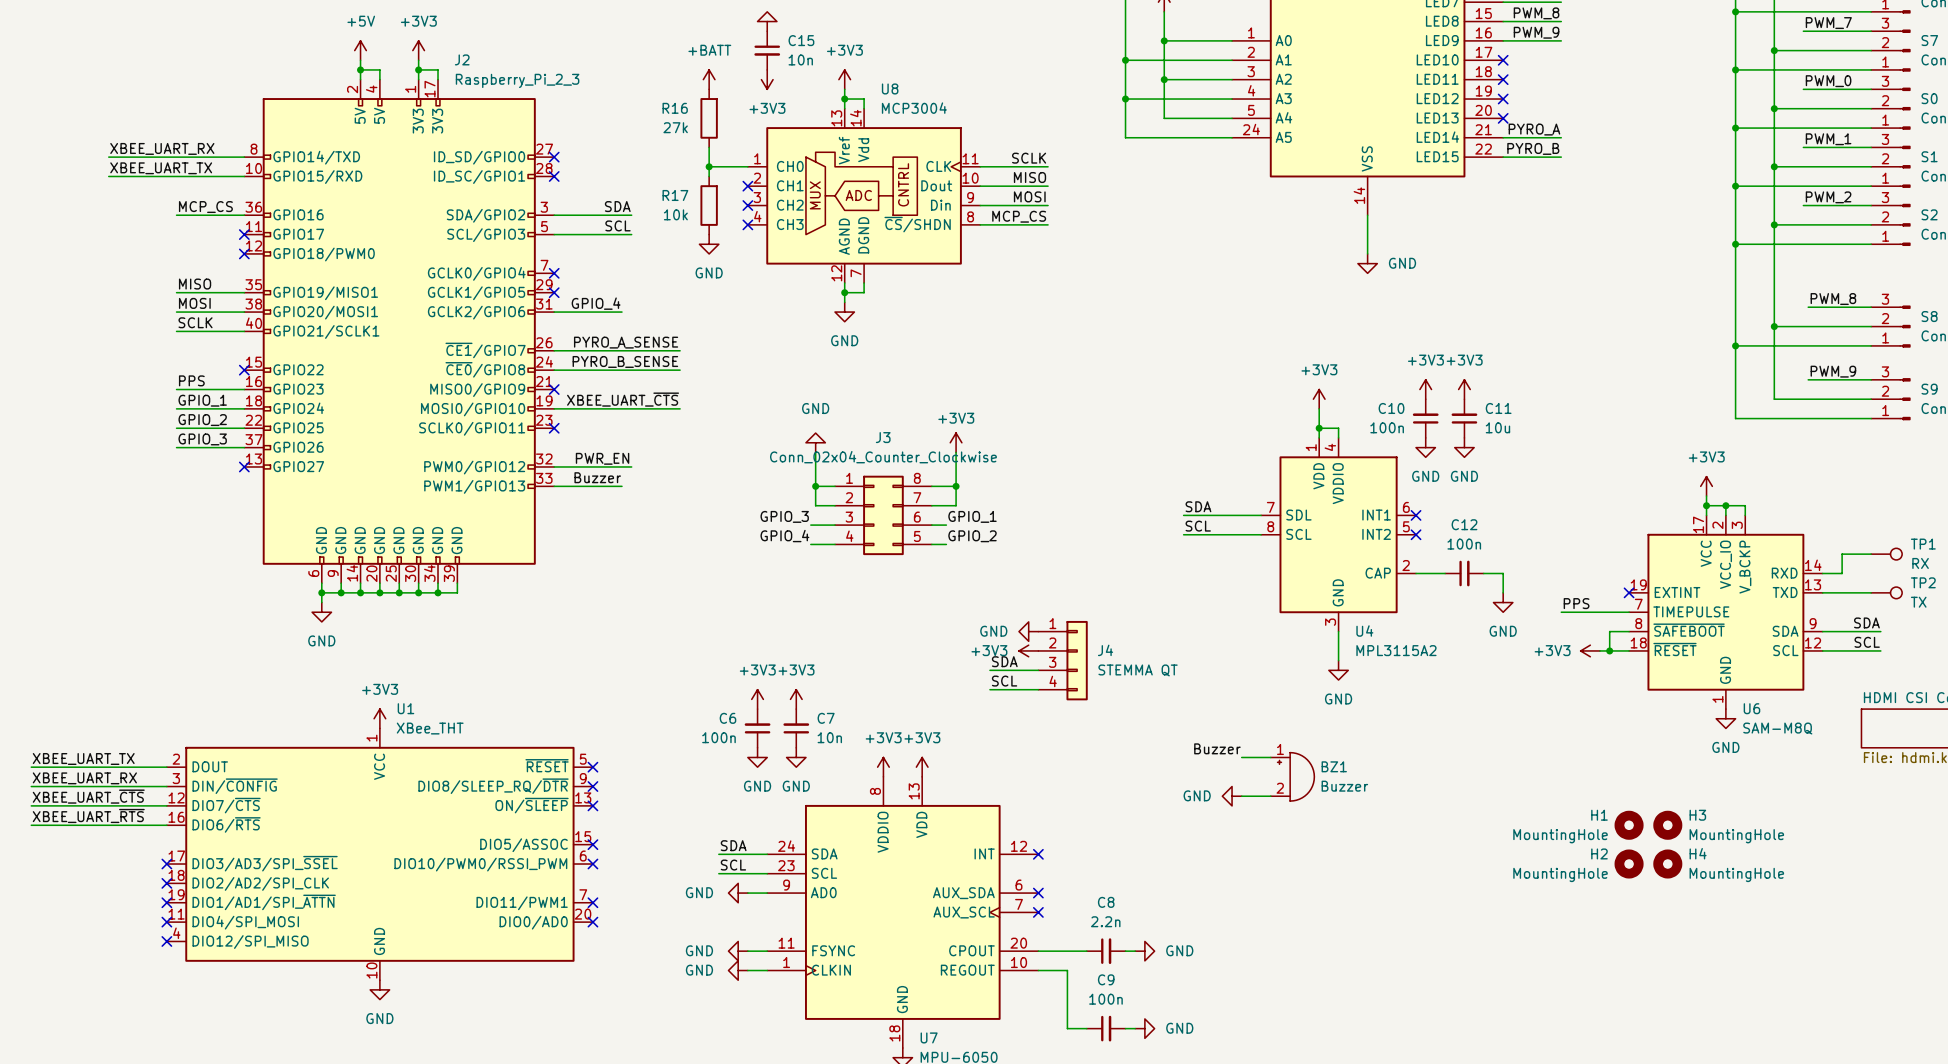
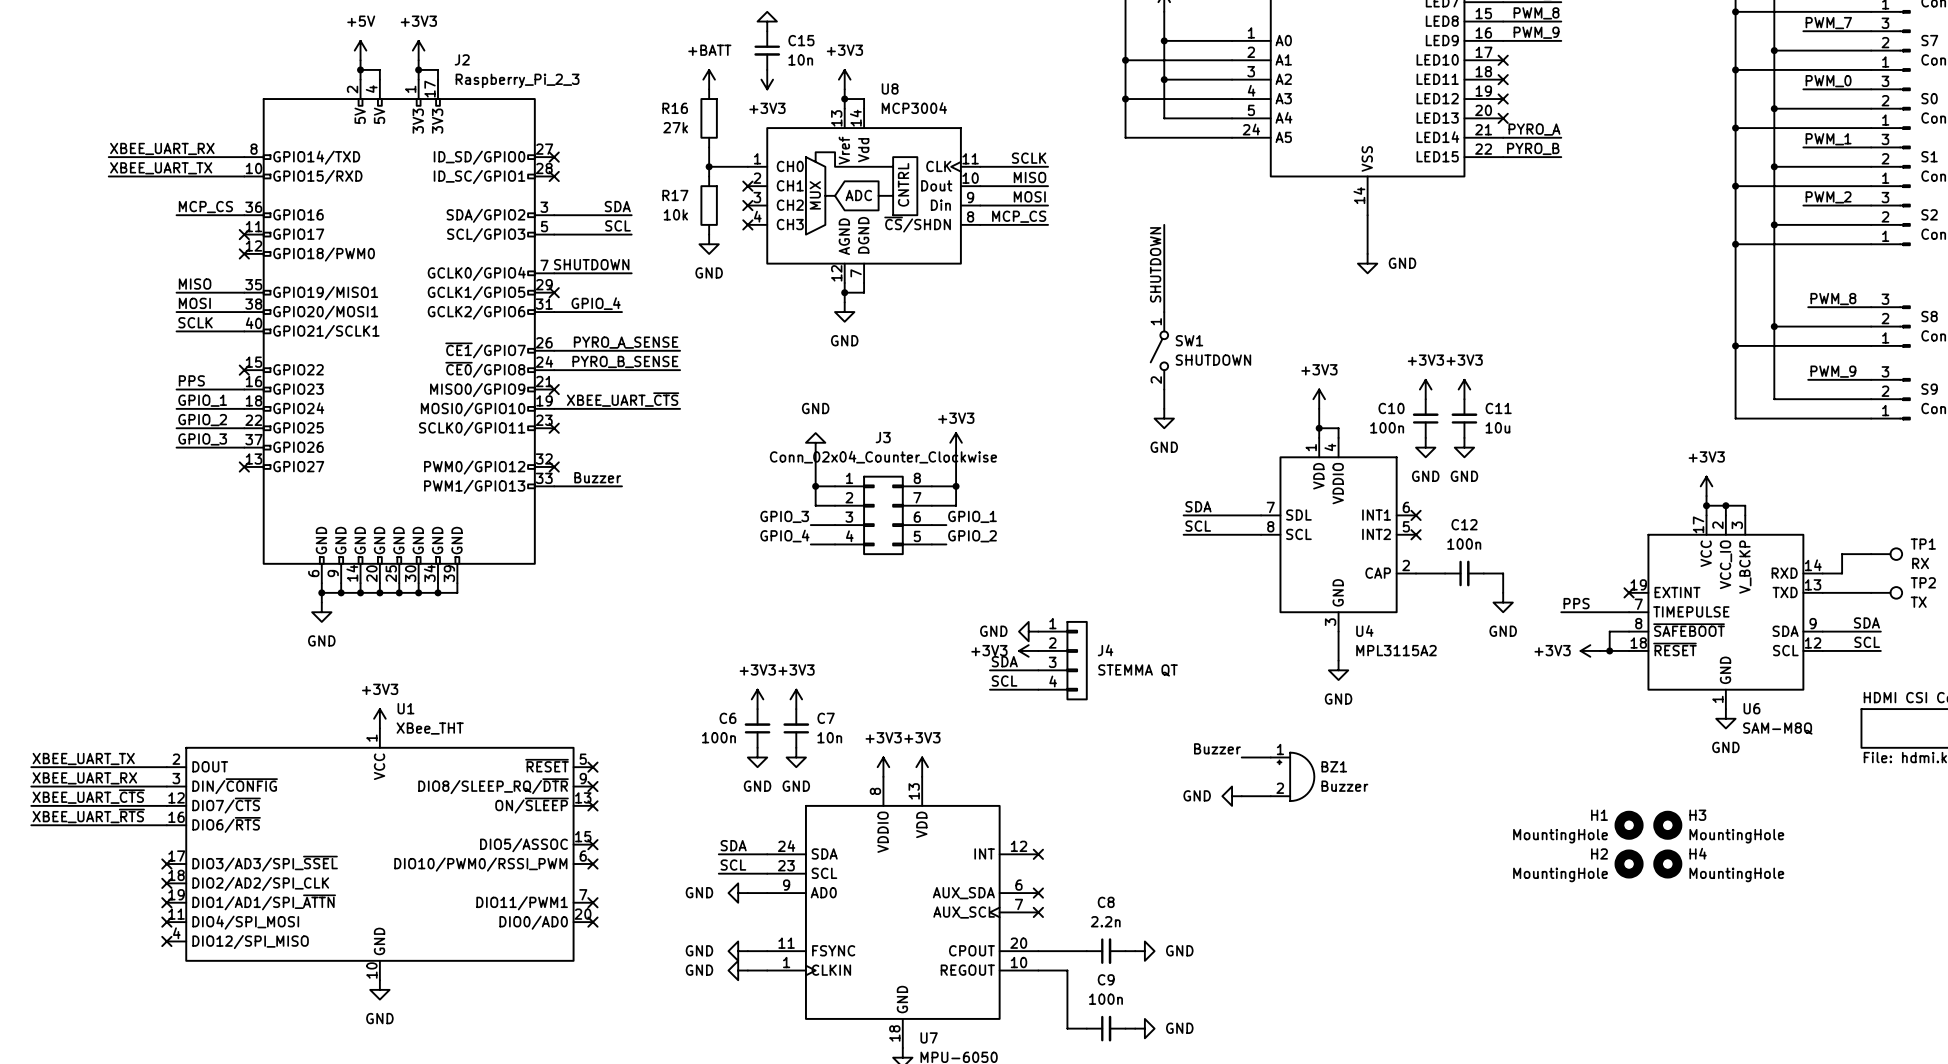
wire: none -> (1164, 224) (1164, 312)
label: none -> SHUTDOWN (591, 264)
label: none -> SHUTDOWN (1155, 264)
wire: none -> (554, 273) (631, 273)
no-connect mark: (554, 273) -> none
SW1: none -> SHUTDOWN (1159, 350)
wire: none -> (1164, 389) (1164, 408)
power symbol: none -> GND (1164, 418)
label: PWR_EN (602, 458) -> none
wire: (554, 466) (631, 466) -> none
no-connect mark: none -> (554, 466)

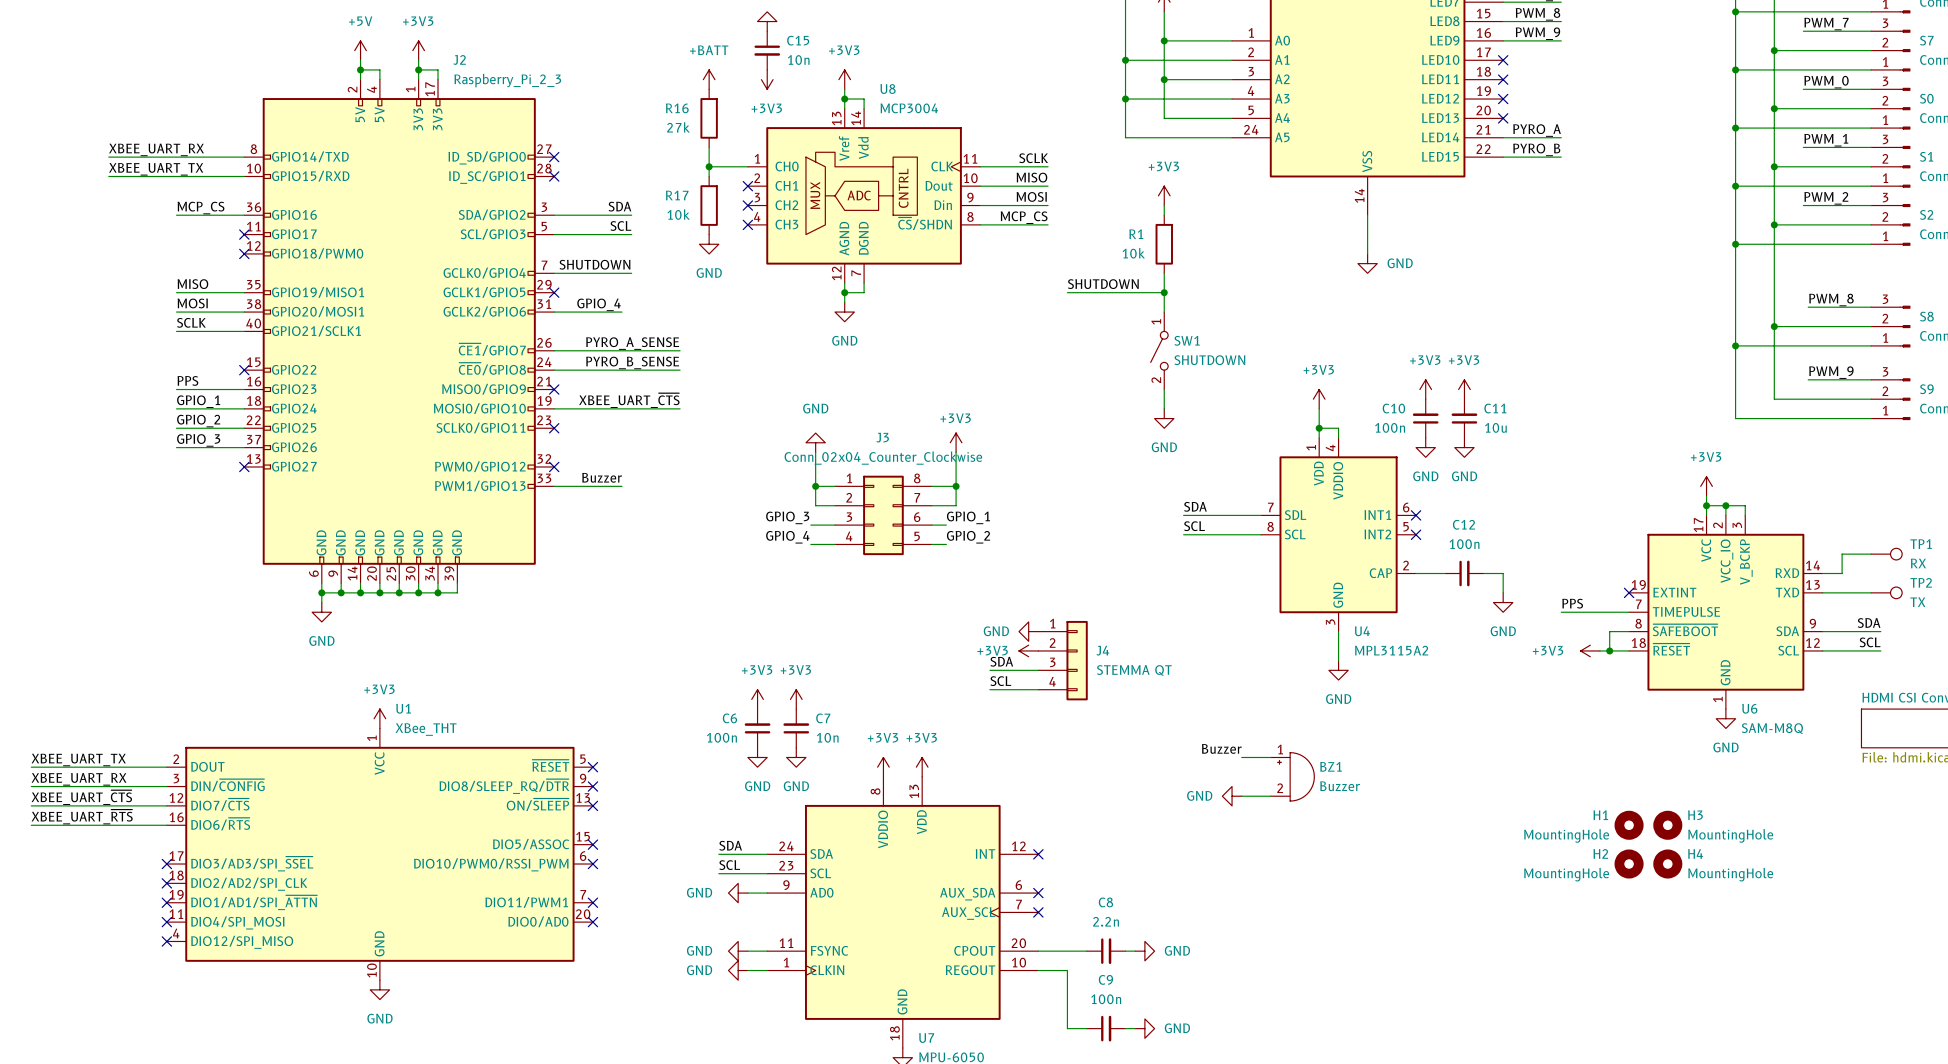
power symbol: none -> +3V3 (1164, 195)
wire: none -> (1164, 205) (1164, 215)
wire: (1164, 224) (1164, 273) -> none
R1: none -> 10k (1164, 244)
label rotation: 0° (1155, 264) -> 90° clockwise (1103, 284)
wire: none -> (1067, 292) (1164, 292)
junction: none -> (1164, 292)

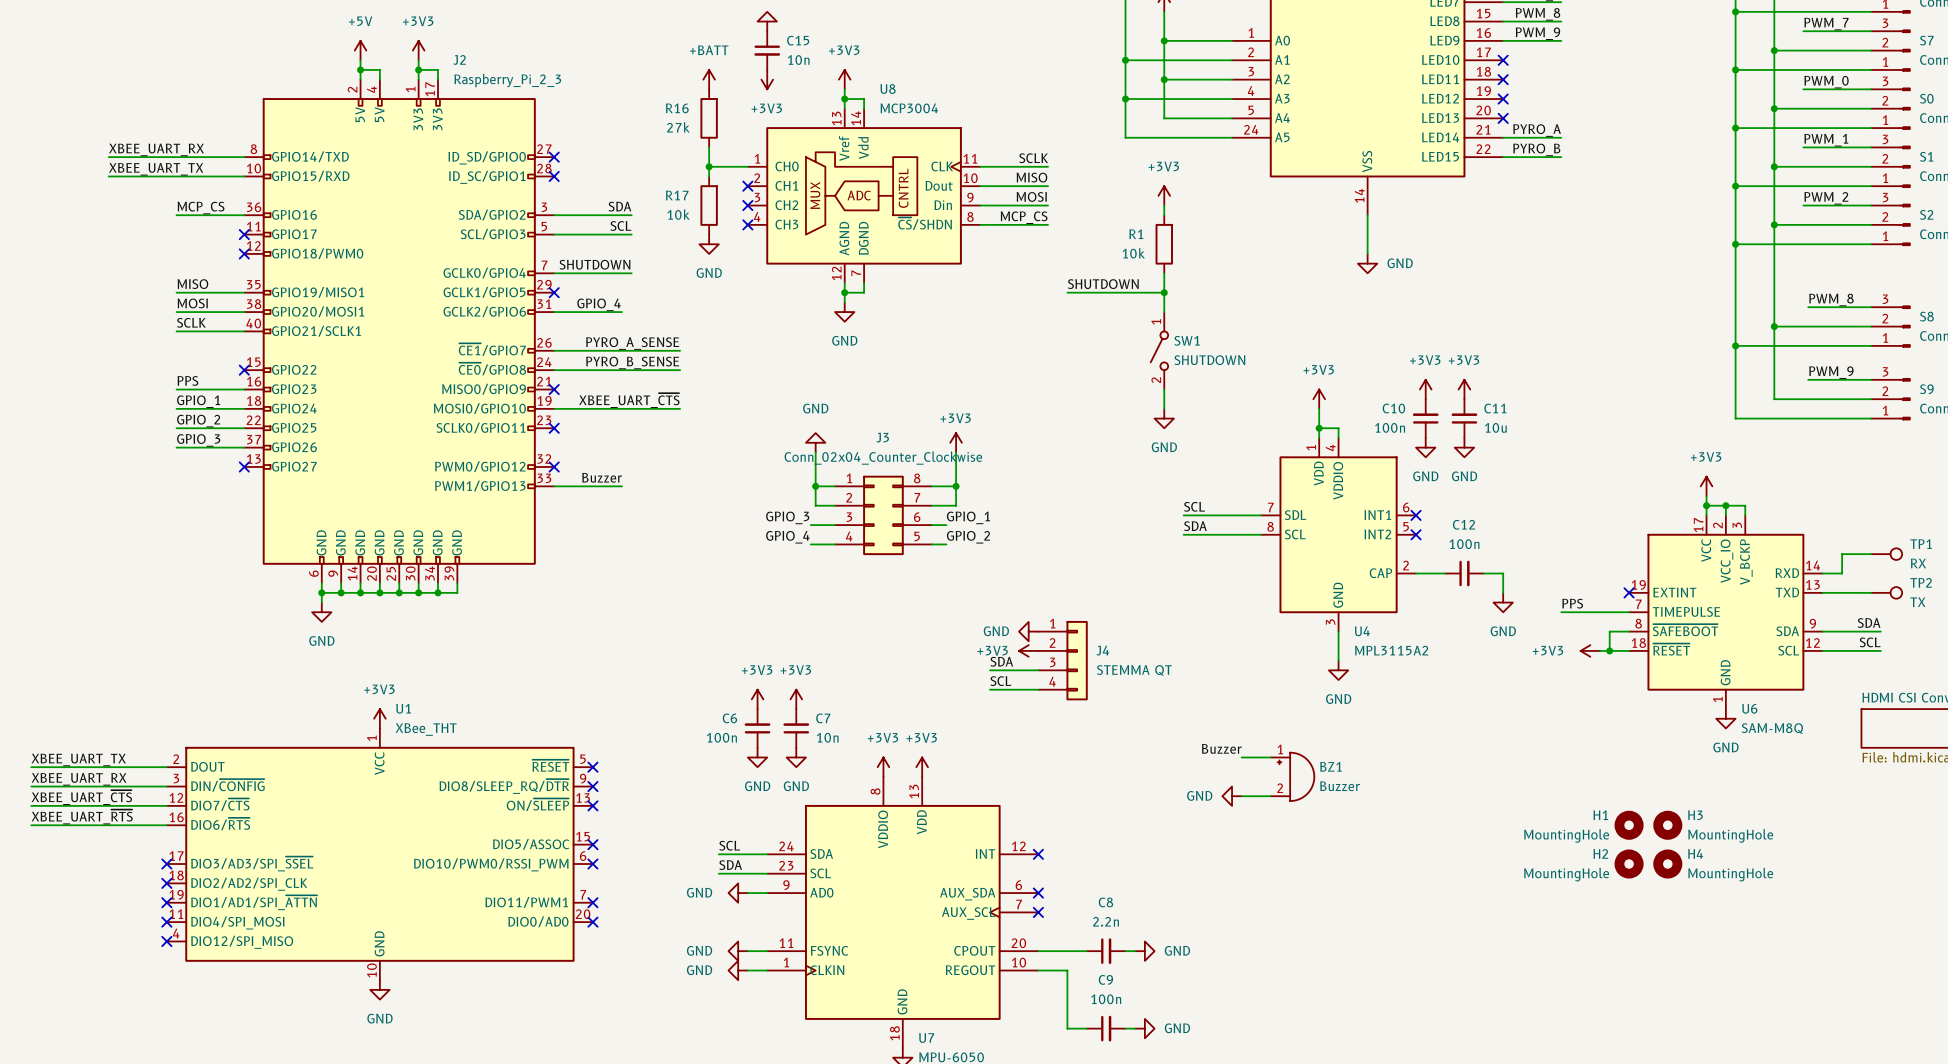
label: SDA (1195, 506) -> SCL (1194, 506)
label: SCL (1194, 526) -> SDA (1195, 526)
label: SDA (730, 845) -> SCL (729, 845)
label: SCL (729, 865) -> SDA (730, 865)

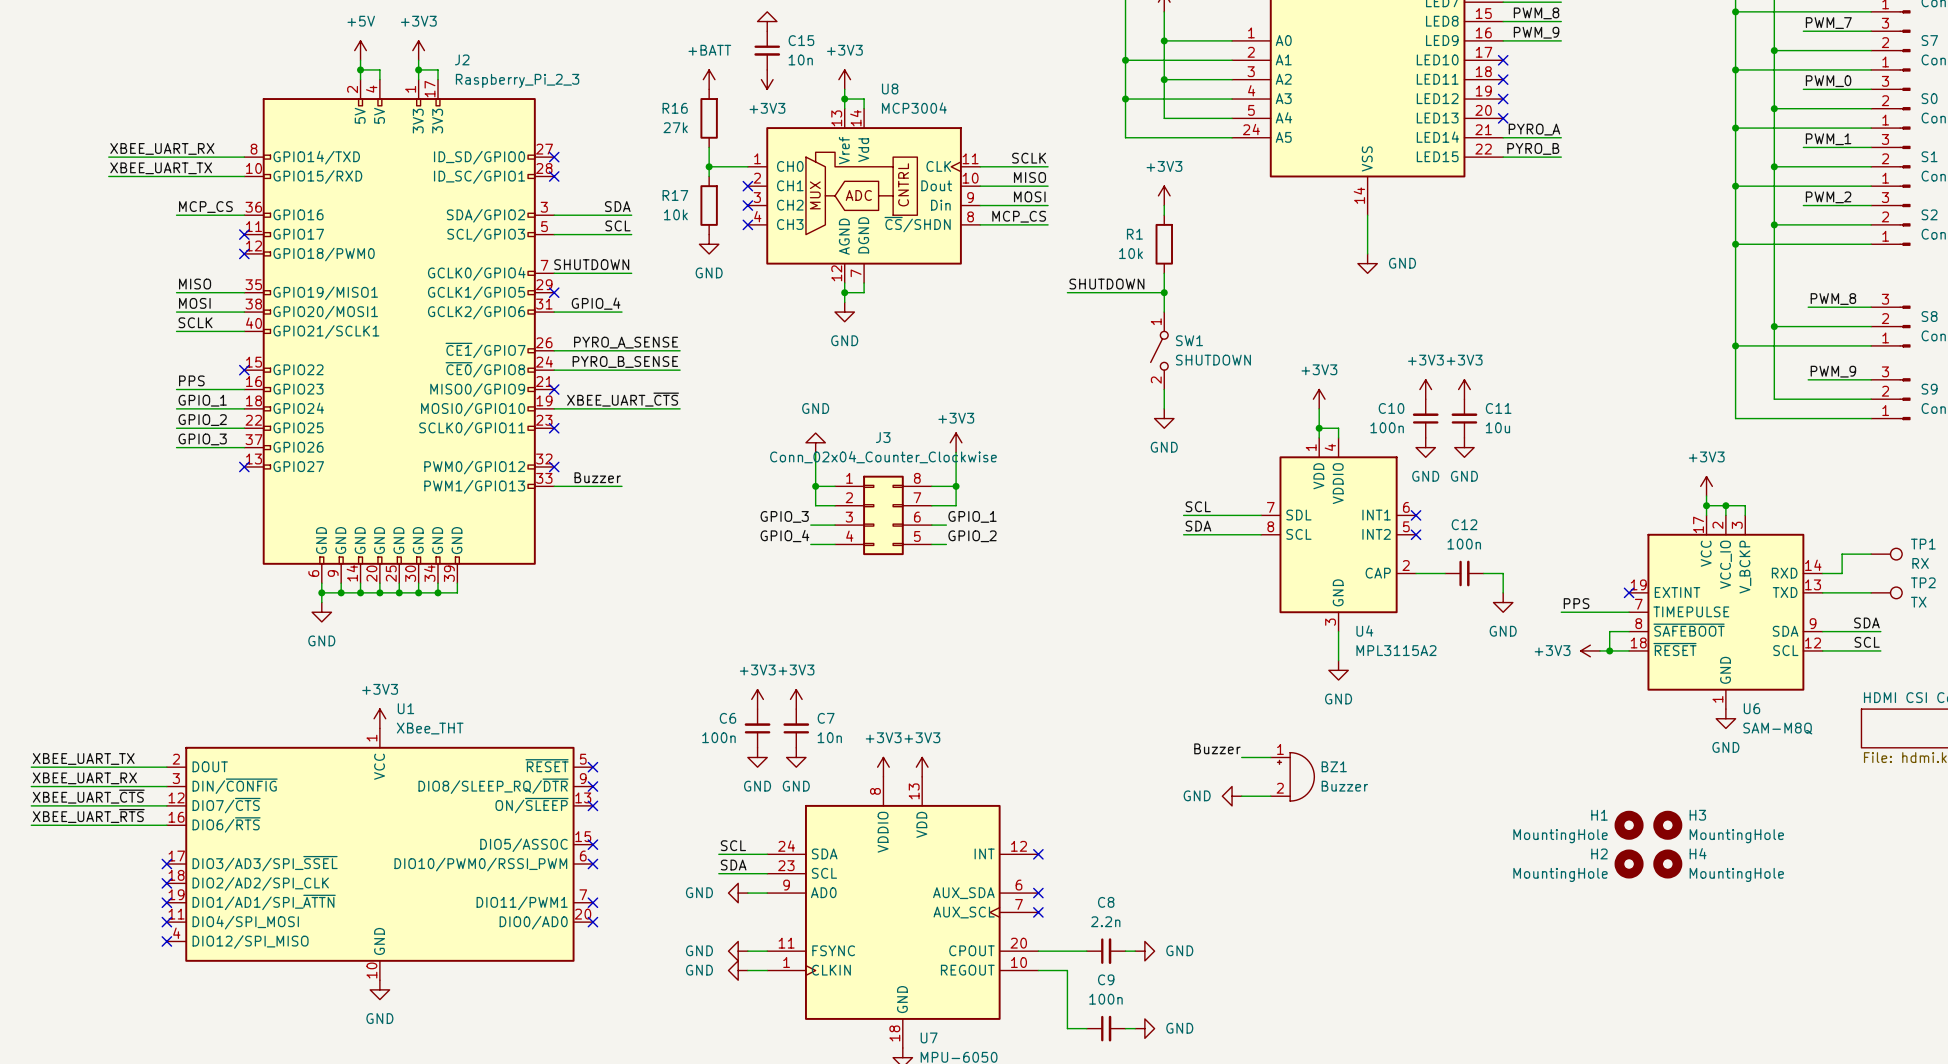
power symbol: GND (1028, 631) -> none
power symbol: +3V3 (1028, 650) -> none
J4: STEMMA QT (1063, 660) -> none
label: SDA (1001, 661) -> none
wire: (989, 670) (1038, 670) -> none
label: SCL (1000, 681) -> none
wire: (989, 689) (1038, 689) -> none

